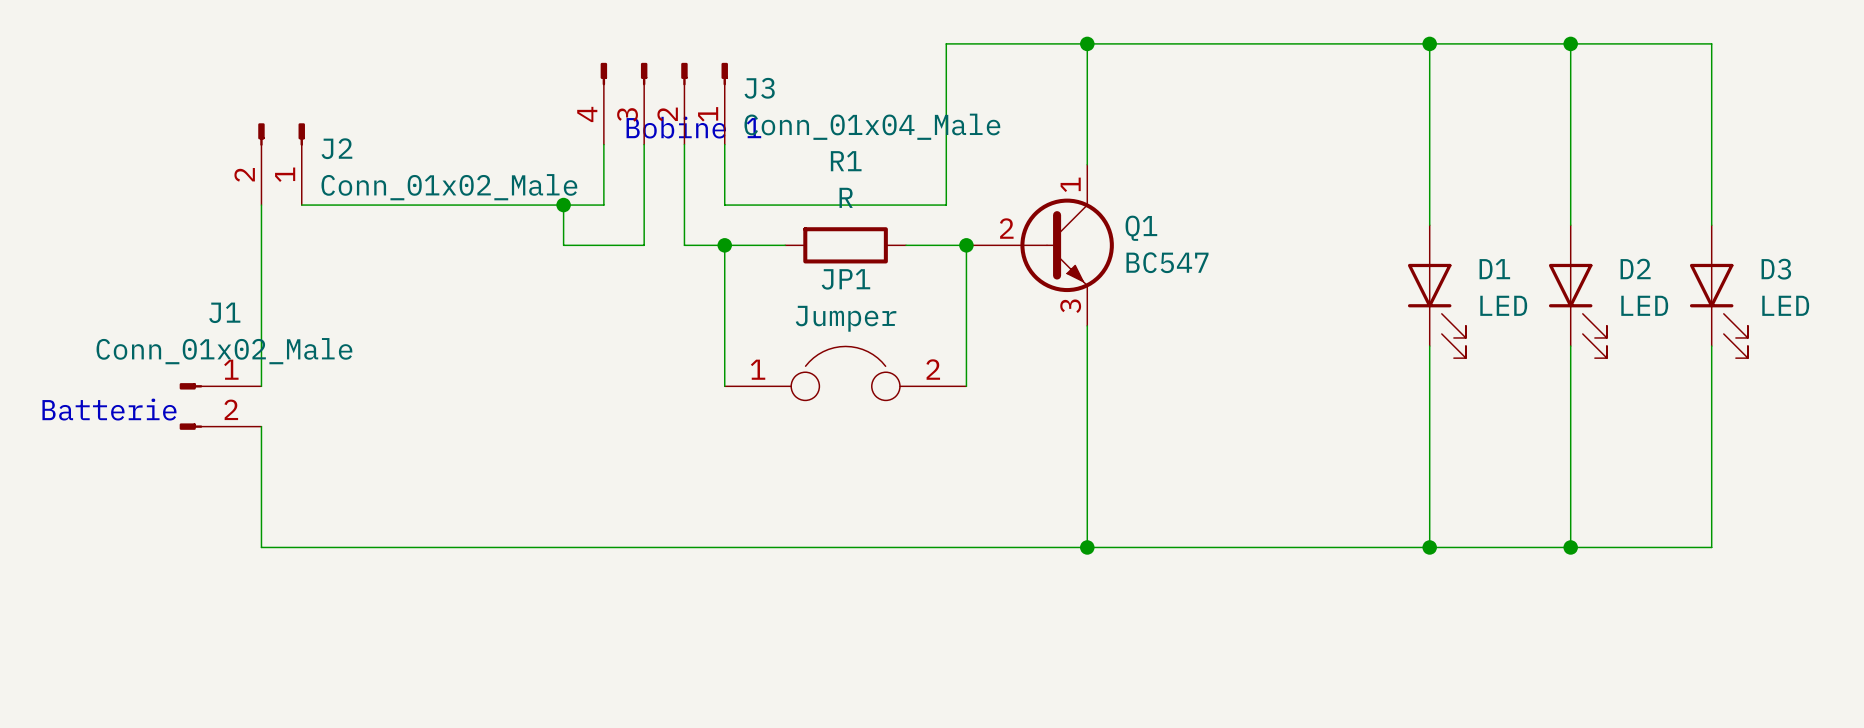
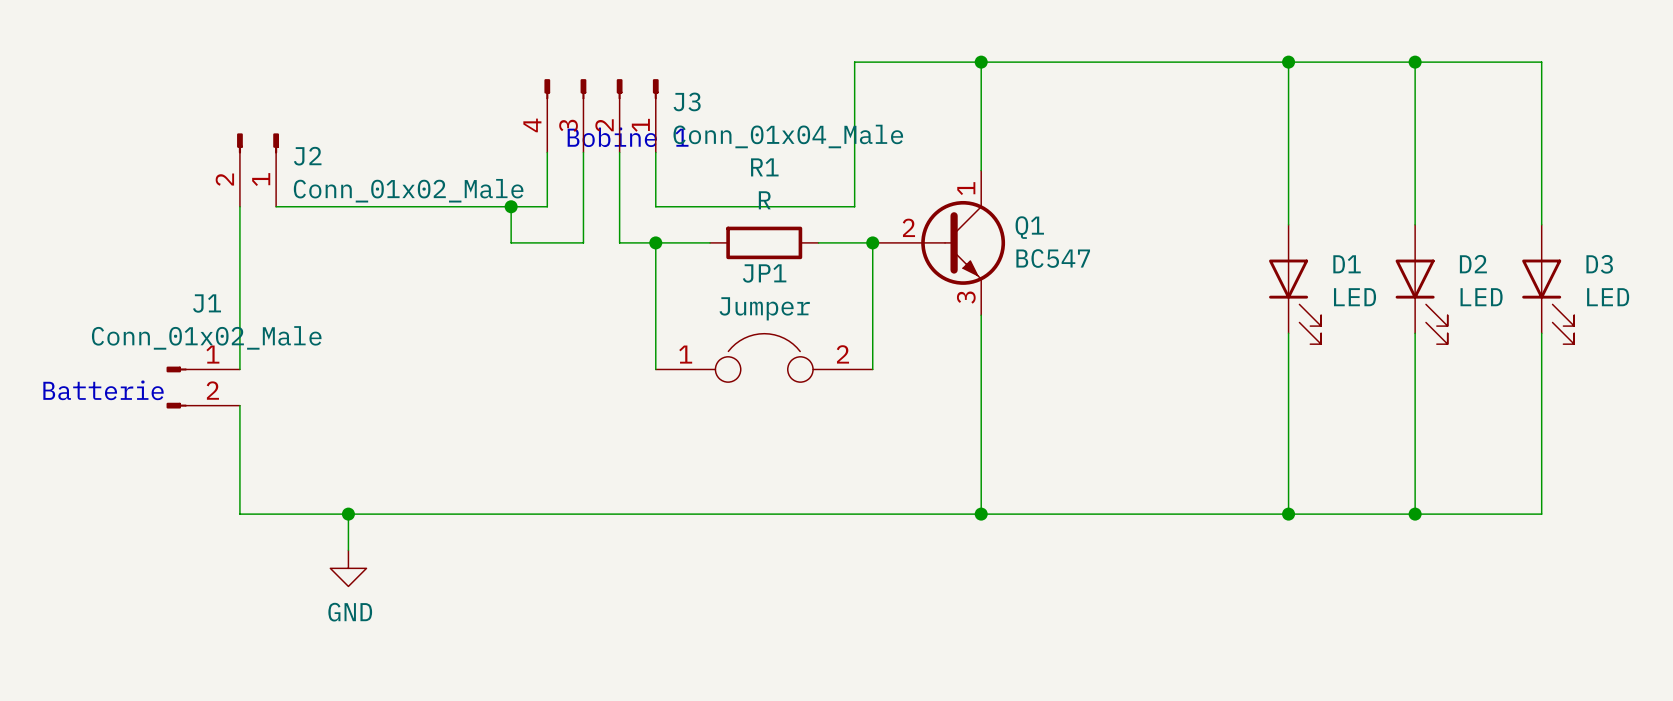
wire: none -> (348, 514) (348, 550)
junction: none -> (348, 514)
power symbol: none -> GND (348, 568)

